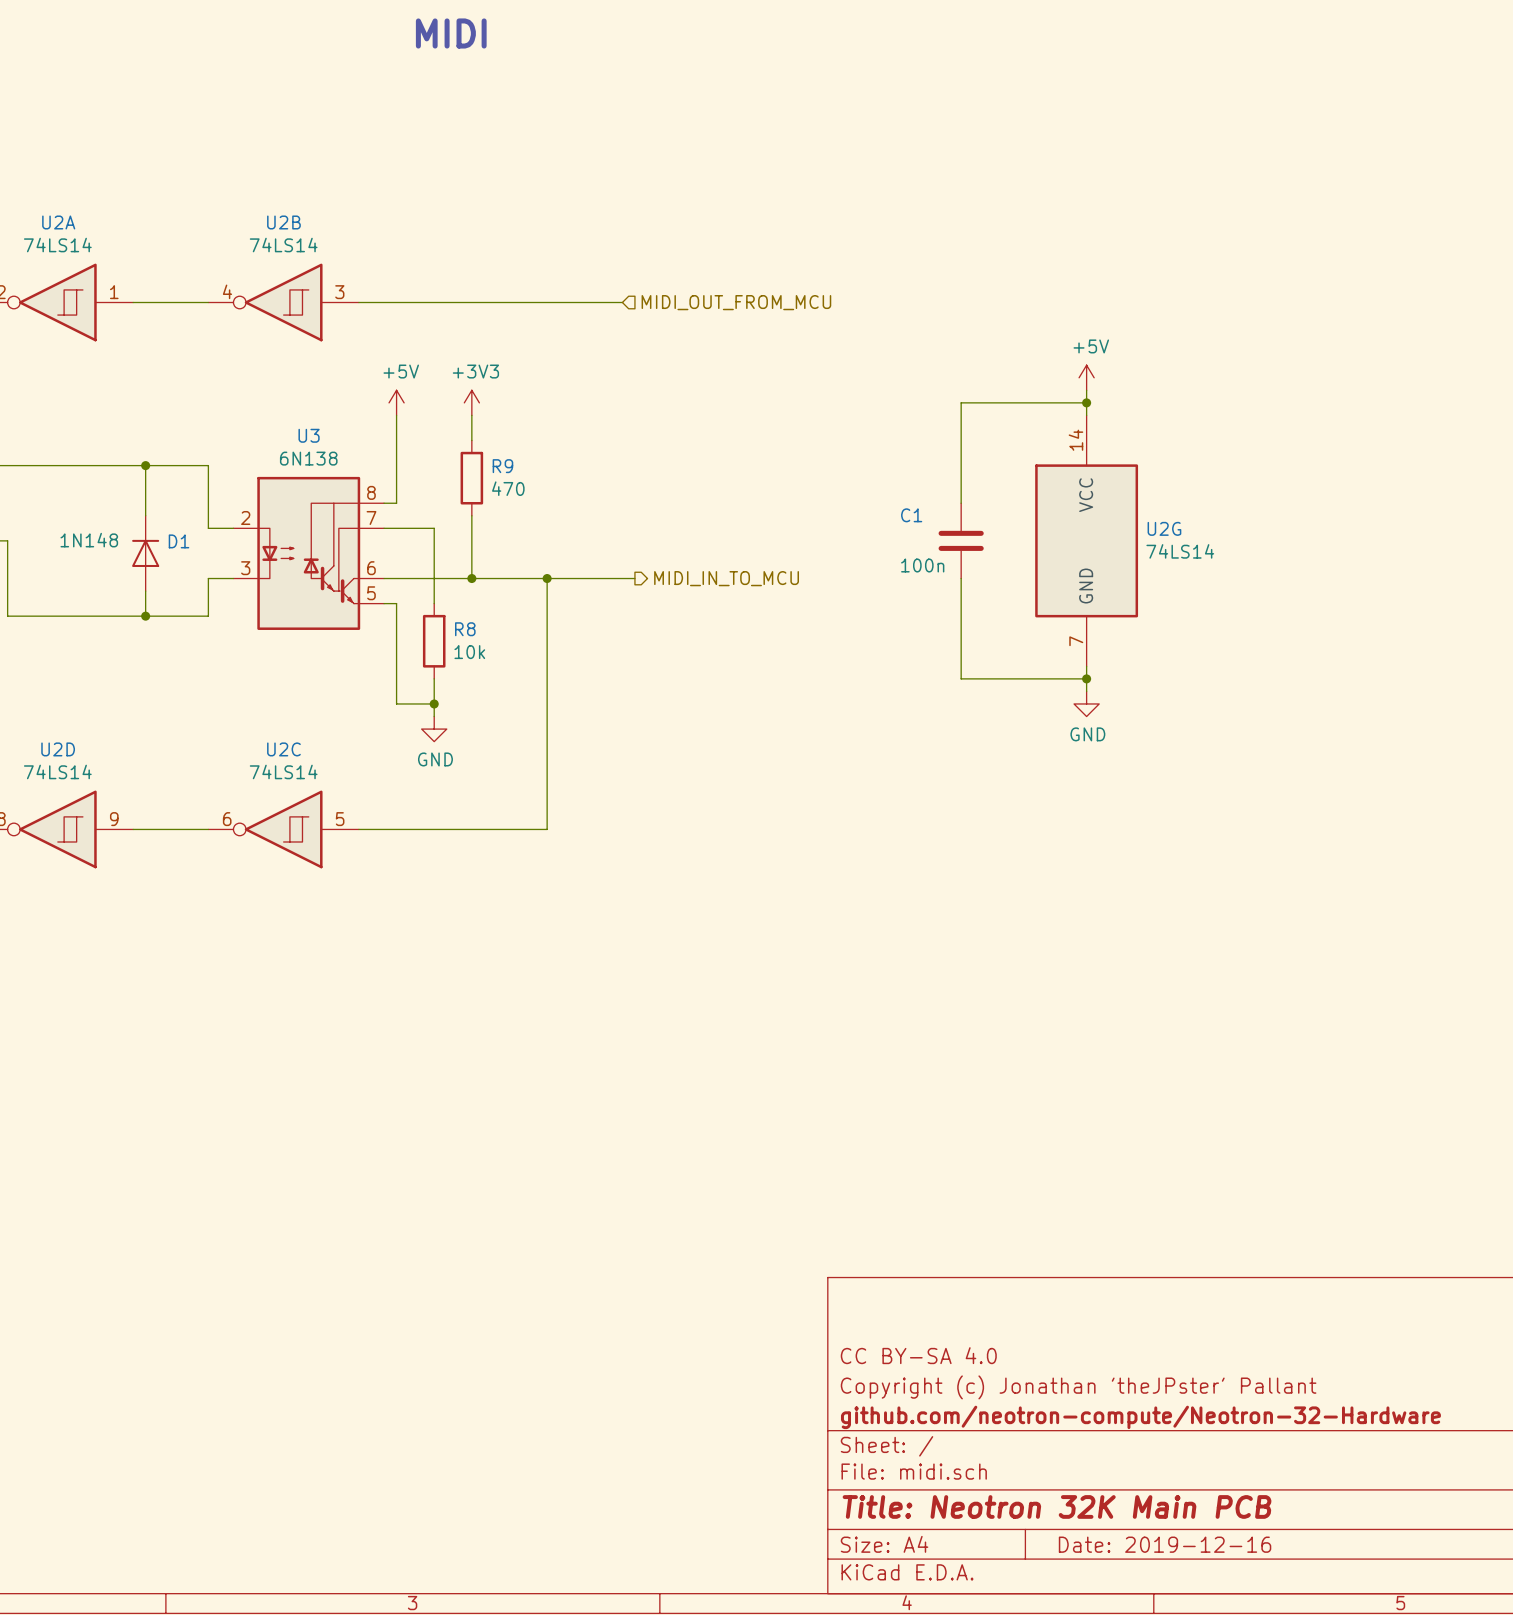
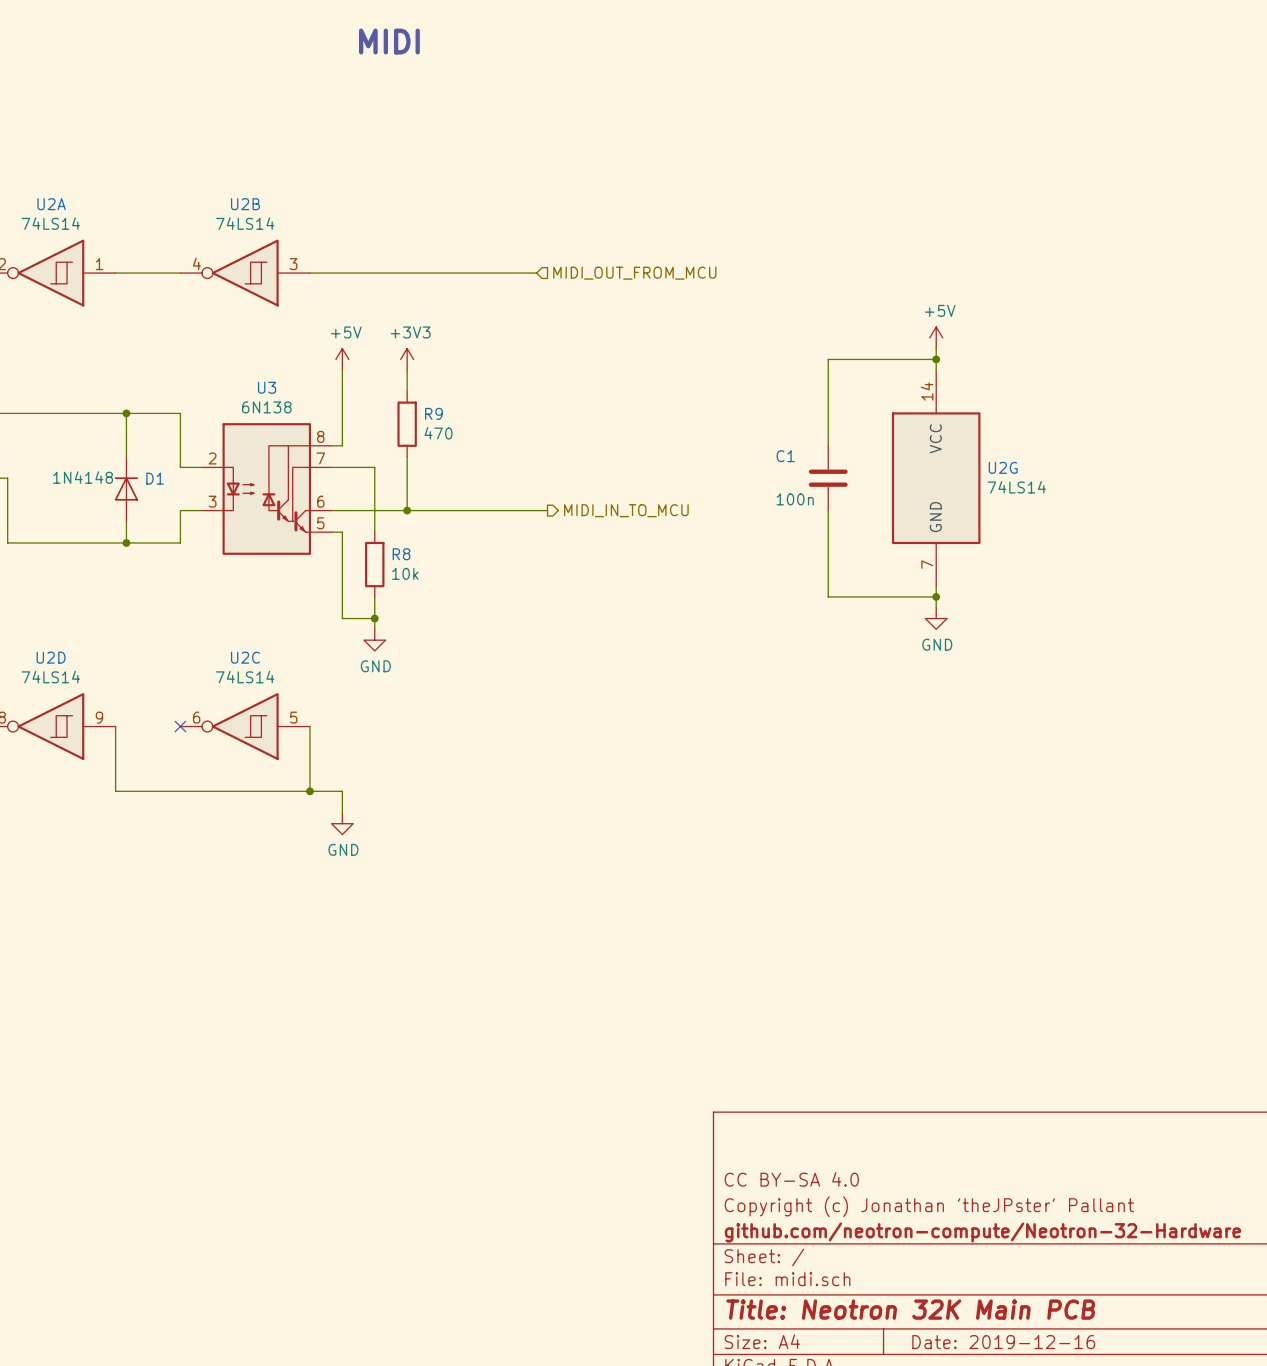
D1 value: 1N148 (89, 540) -> 1N4148 (83, 477)
wire: (547, 578) (547, 829) (358, 829) -> (309, 791) (309, 726)
junction: (547, 578) -> none
wire: (133, 829) (208, 829) -> (115, 726) (115, 791) (342, 791) (342, 812)
no-connect mark: none -> (180, 726)
junction: none -> (309, 791)
power symbol: none -> GND (342, 823)

